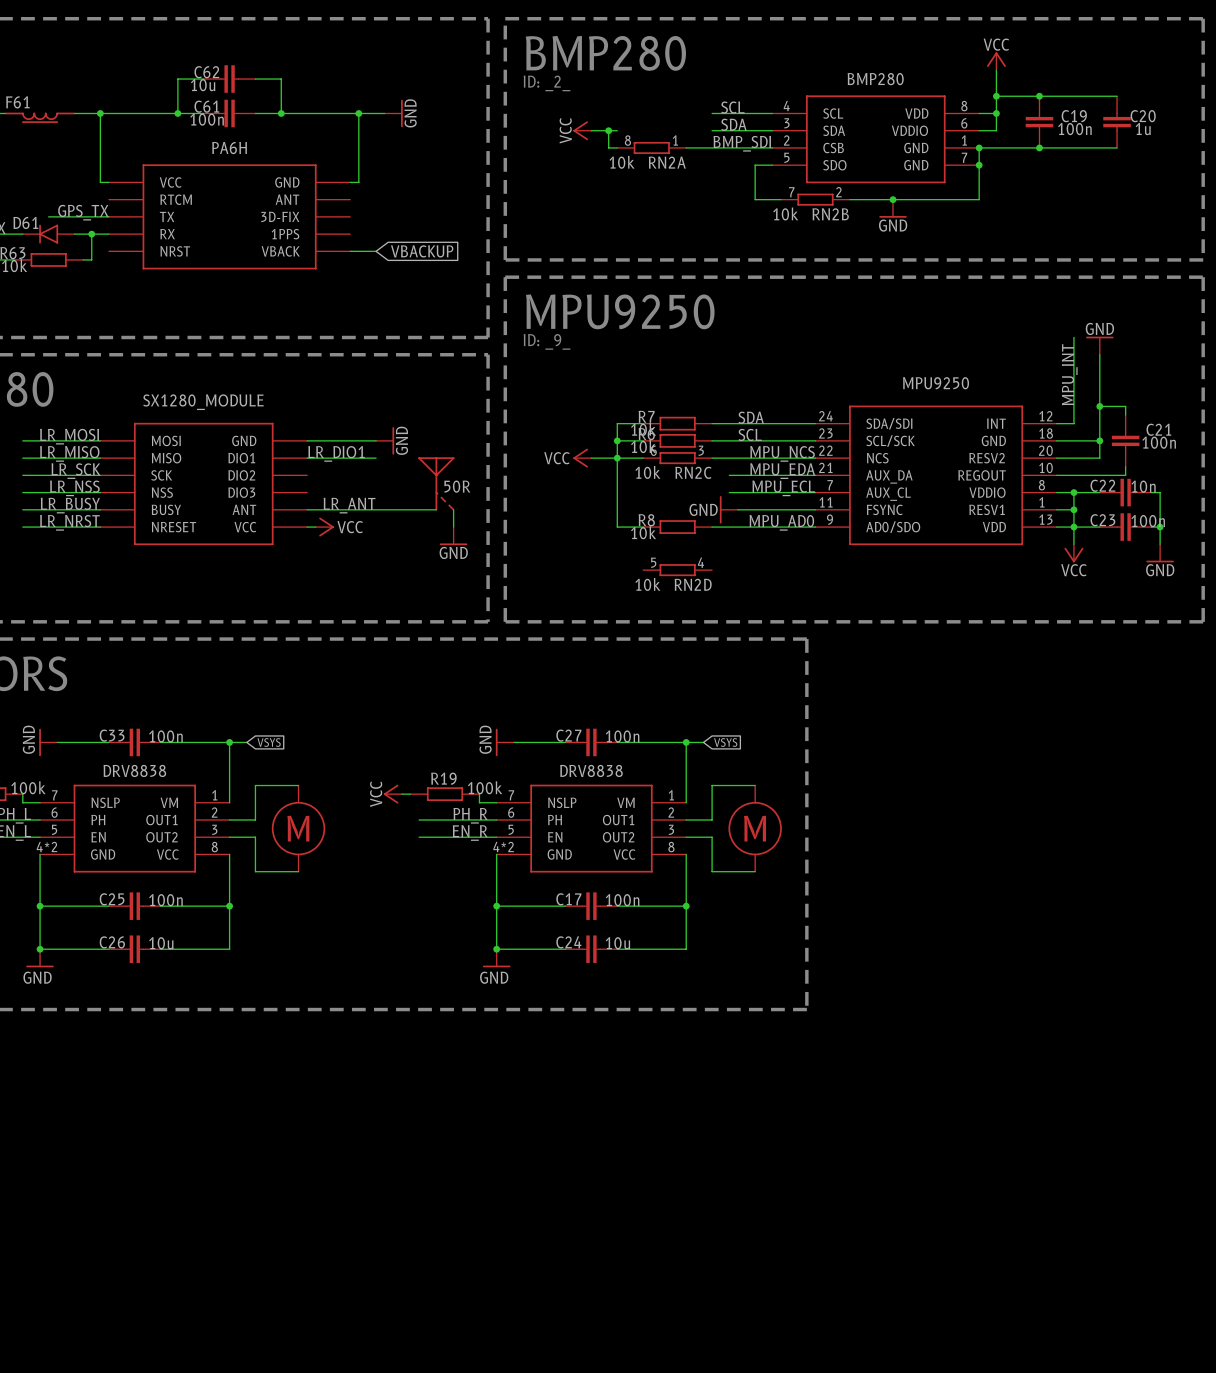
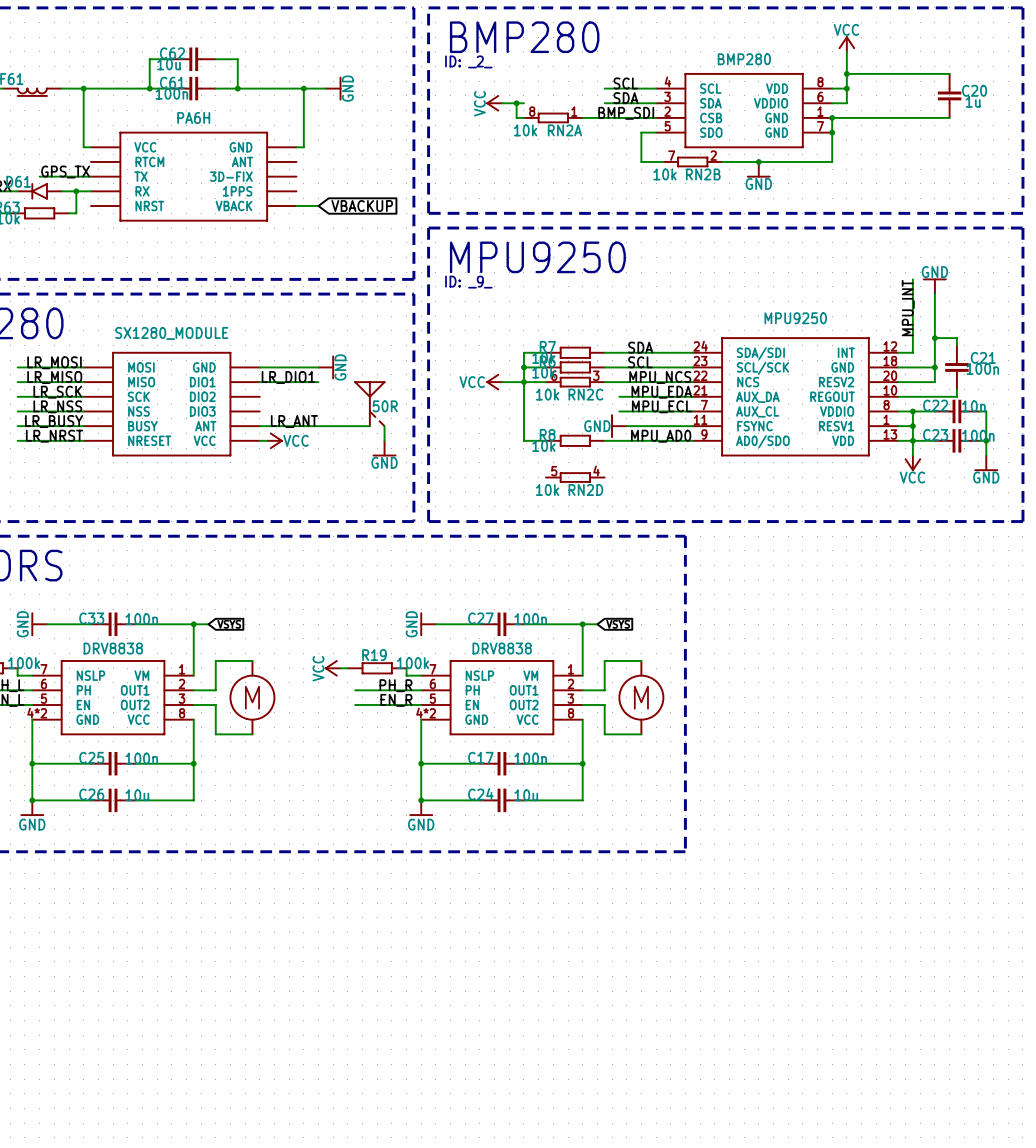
junction: (1039, 96) -> none
C19: 100n (1039, 122) -> none
junction: (1039, 147) -> none

